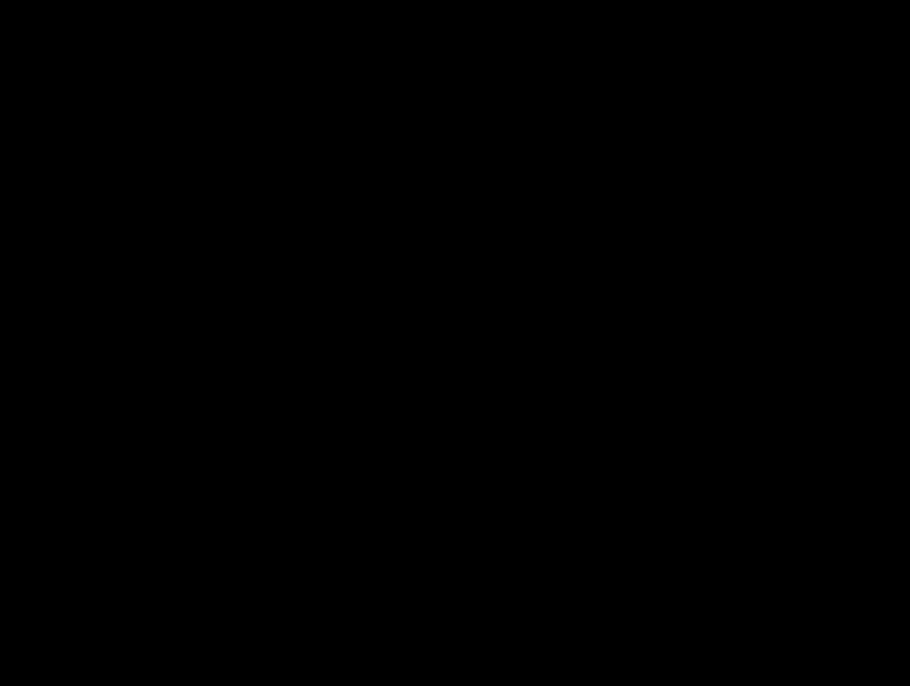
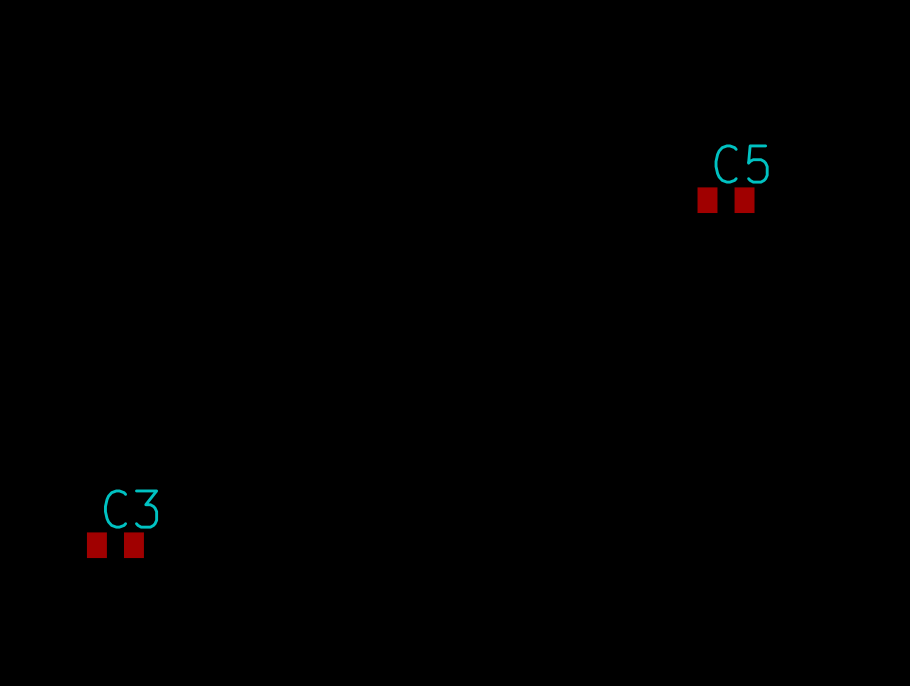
C5: none -> (726, 200)
C3: none -> (115, 545)

